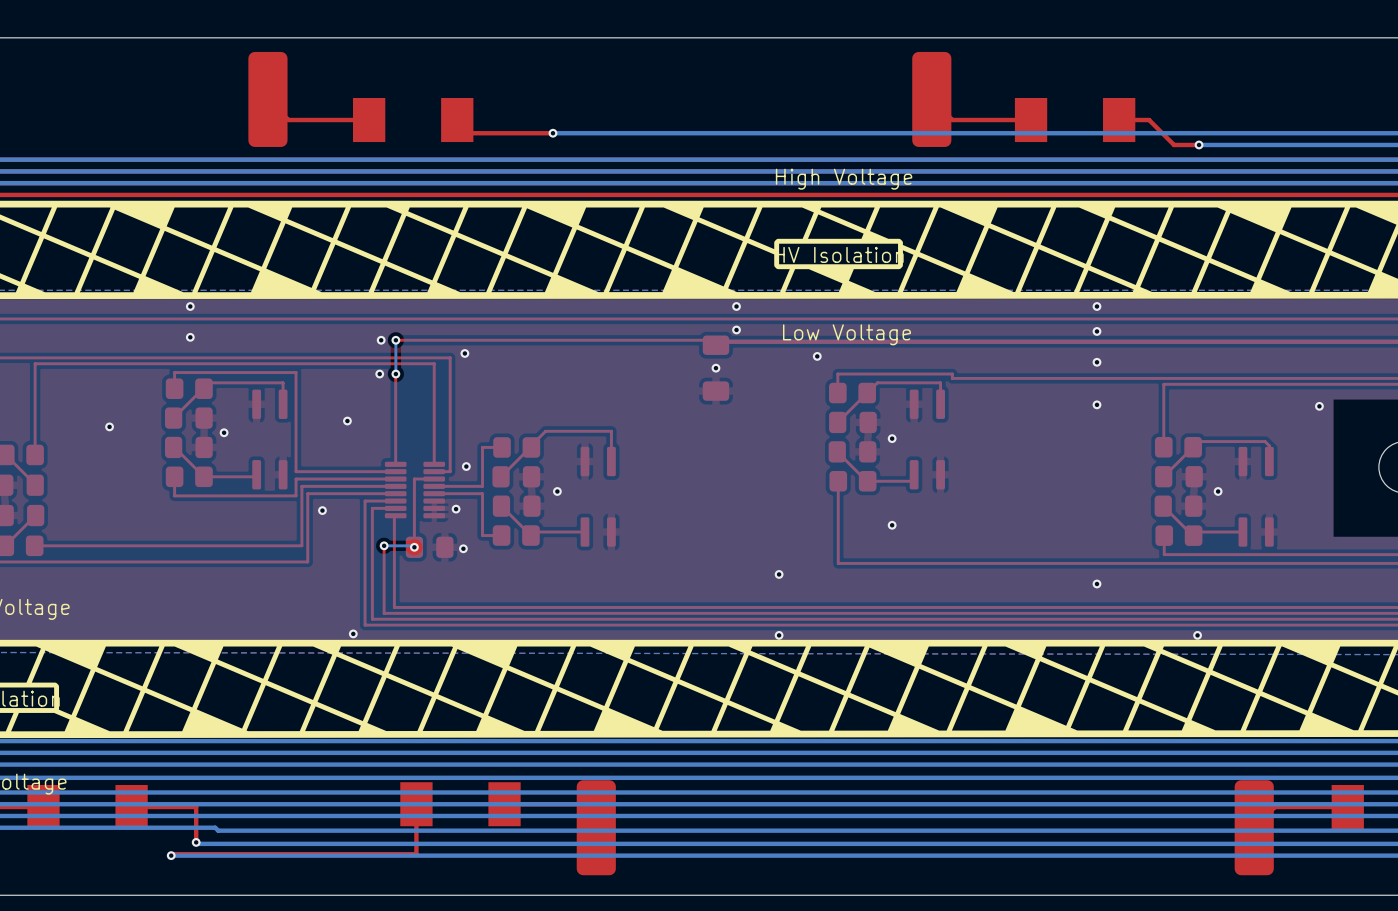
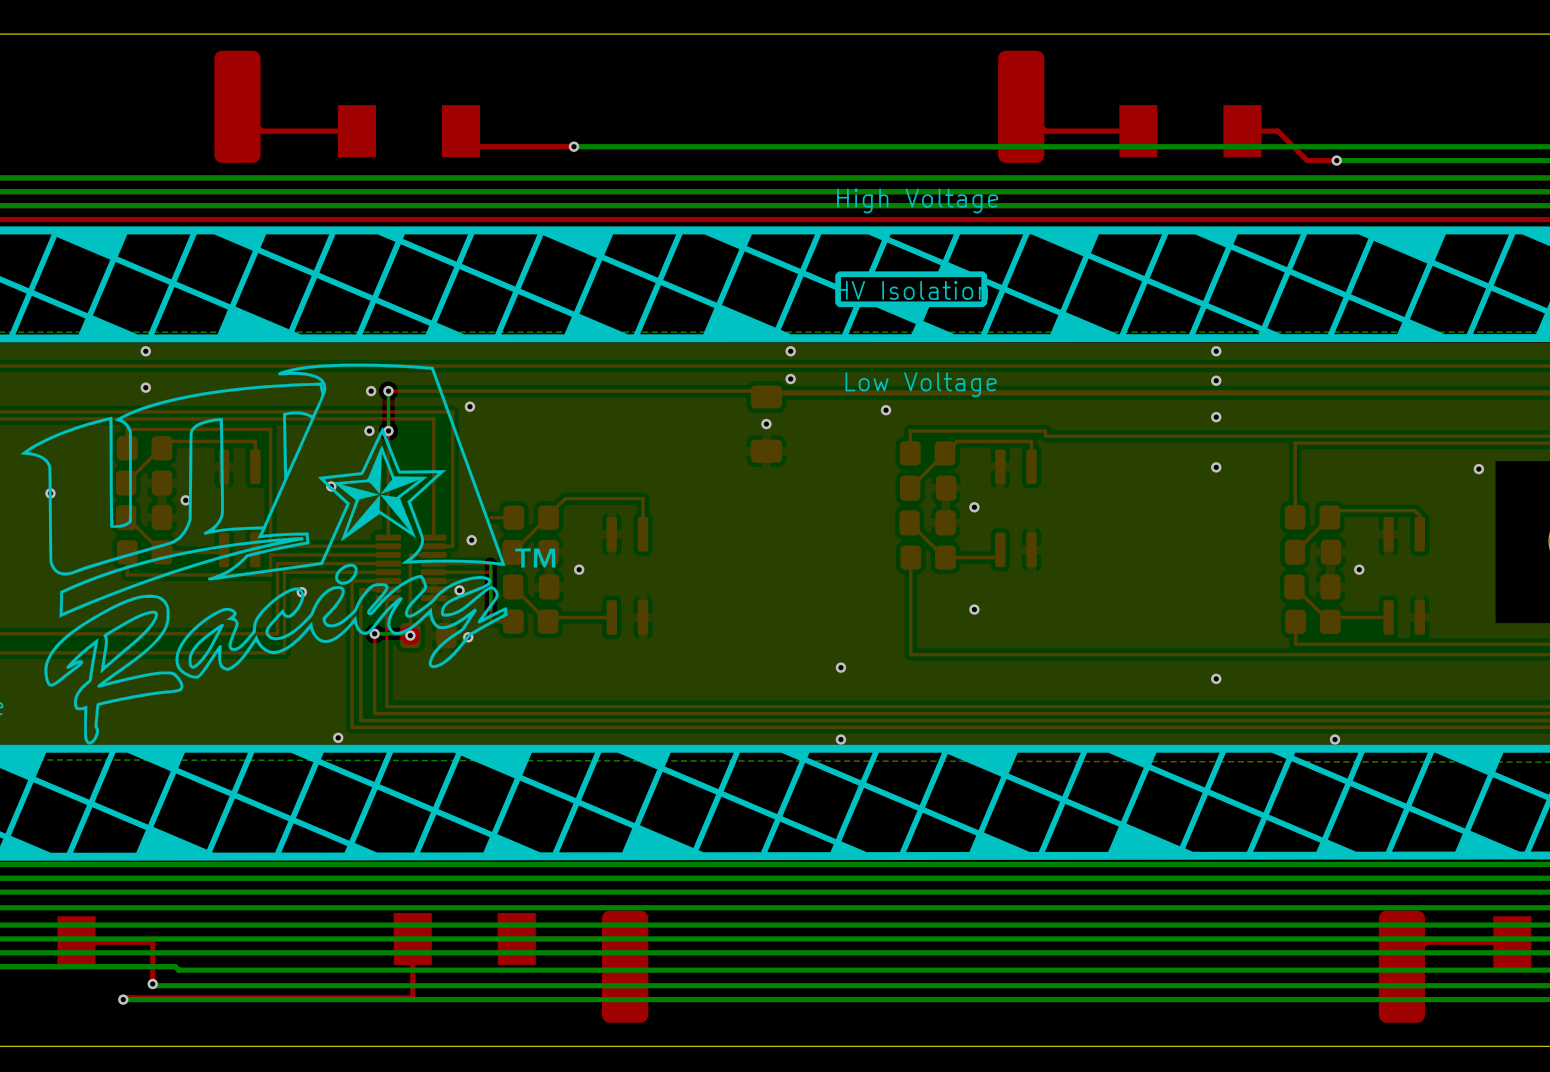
drawing: none -> [20, 363, 556, 745]
top track: (482, 447) (482, 486) -> none
bottom track: none -> (490, 563) (490, 609)

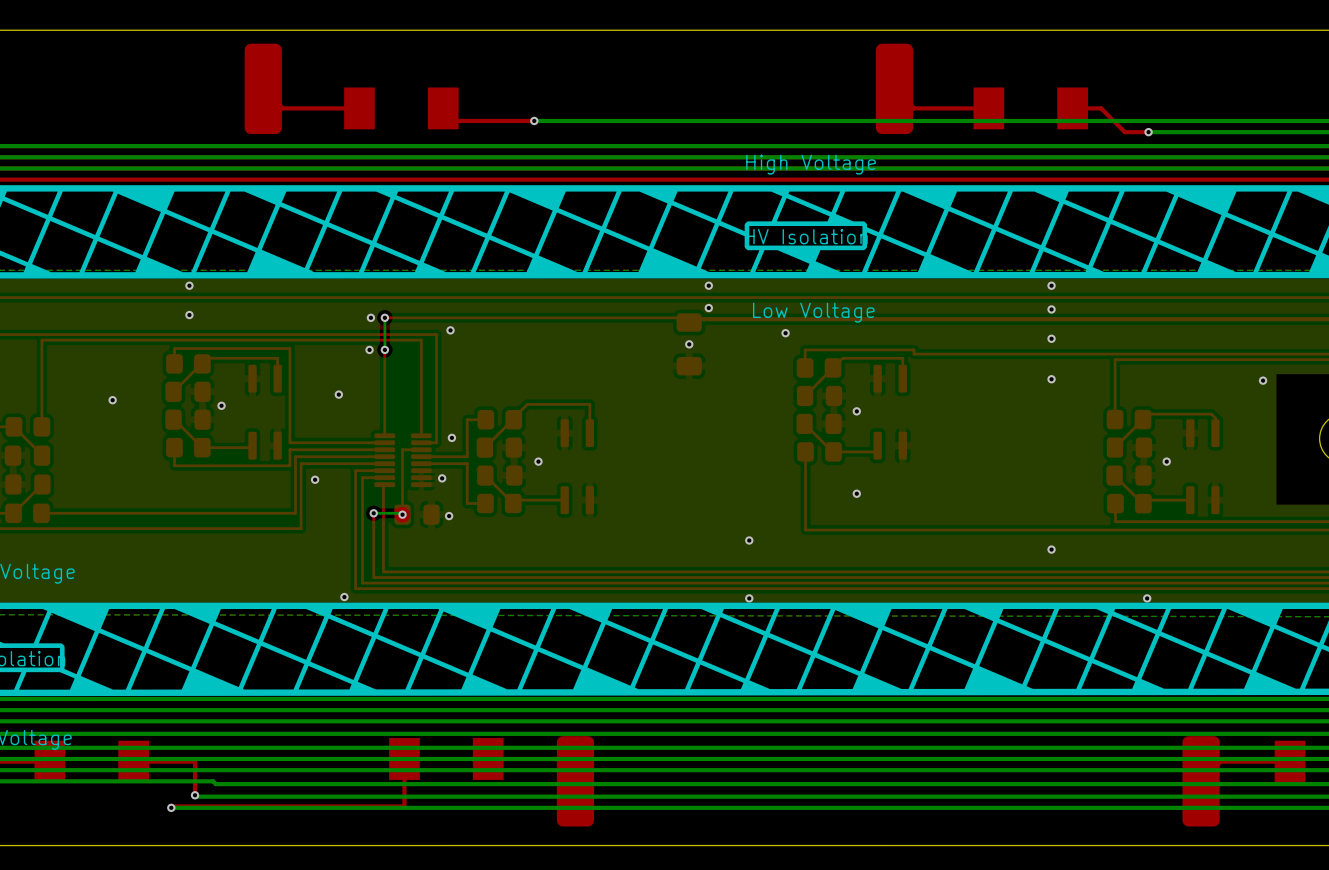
drawing: [20, 363, 556, 745] -> none
top track: none -> (467, 419) (467, 456)
bottom track: (490, 563) (490, 609) -> none

